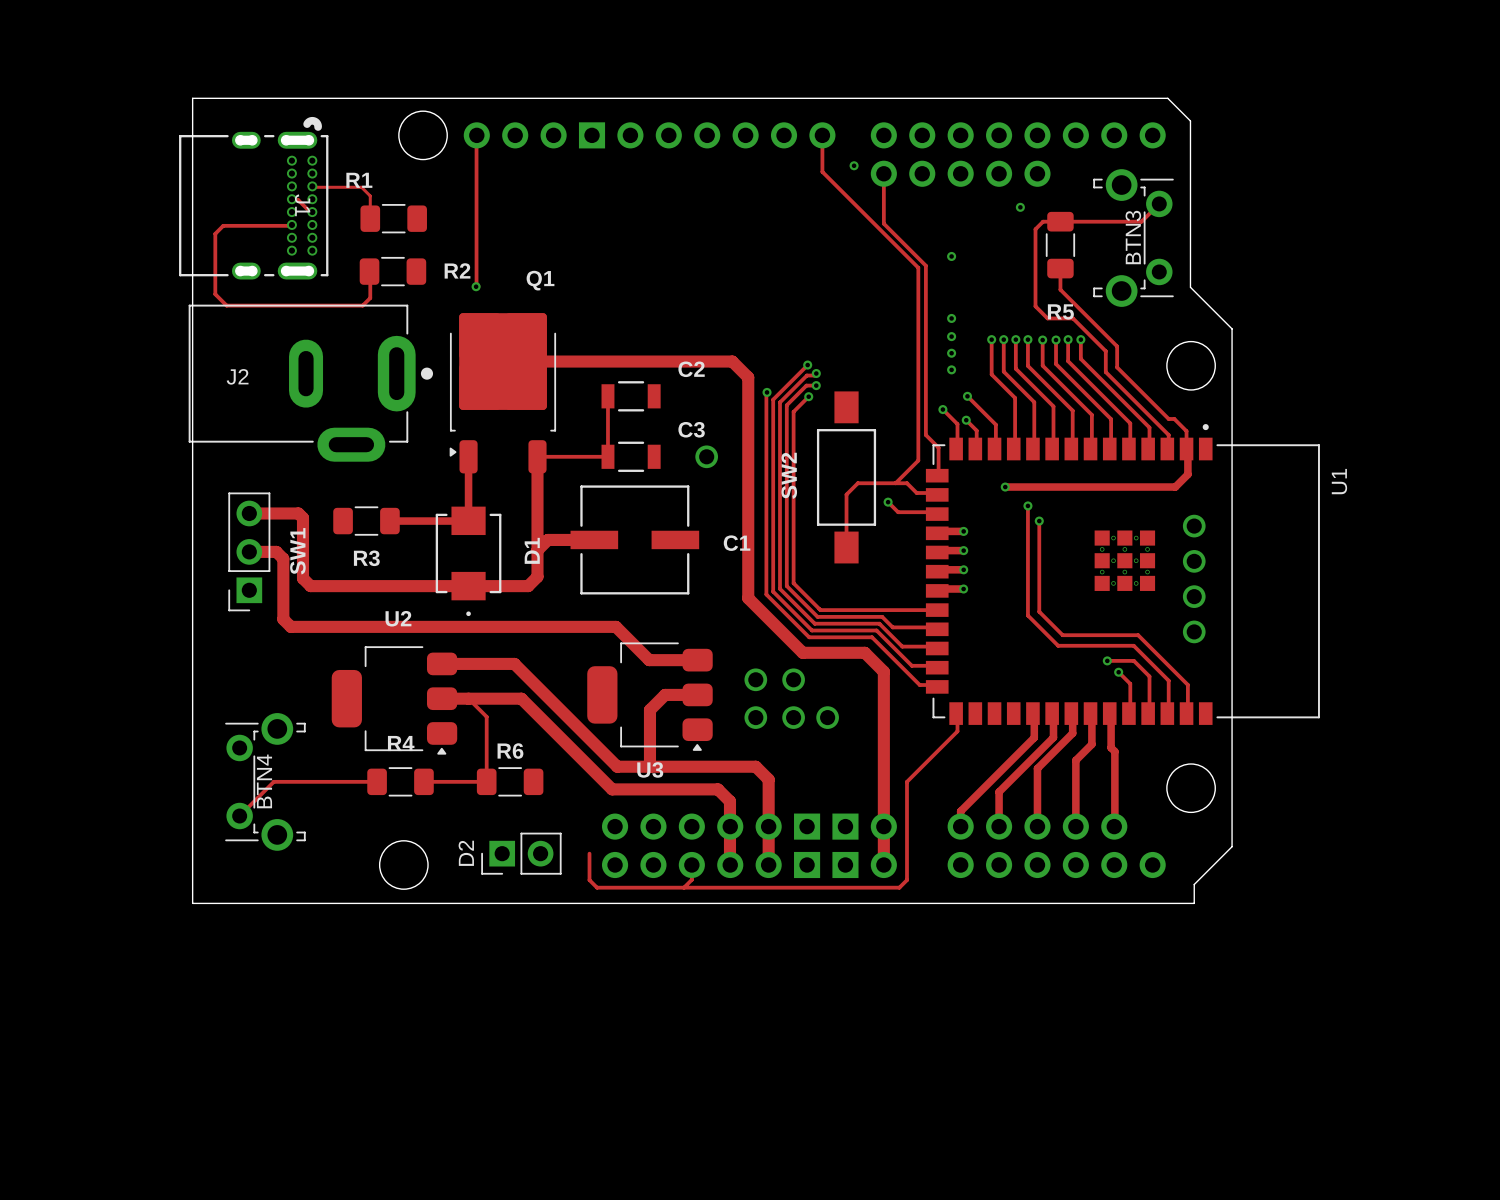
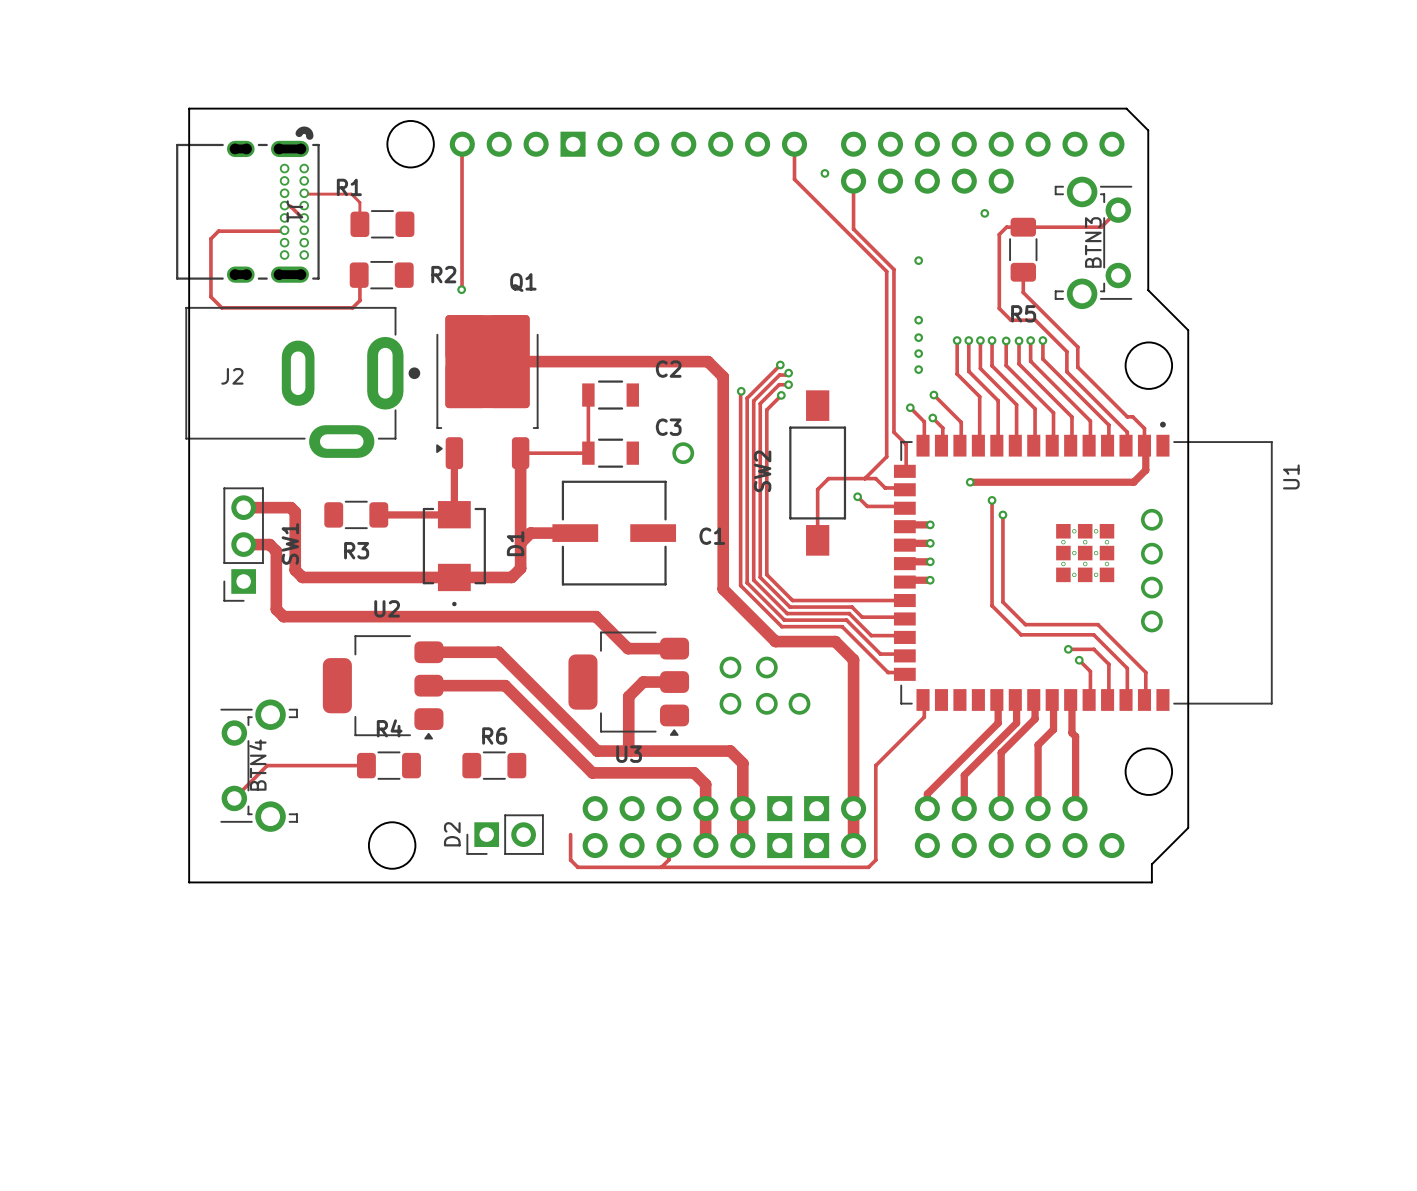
track: (468, 698) (486, 716) (486, 781) (423, 781) -> none

